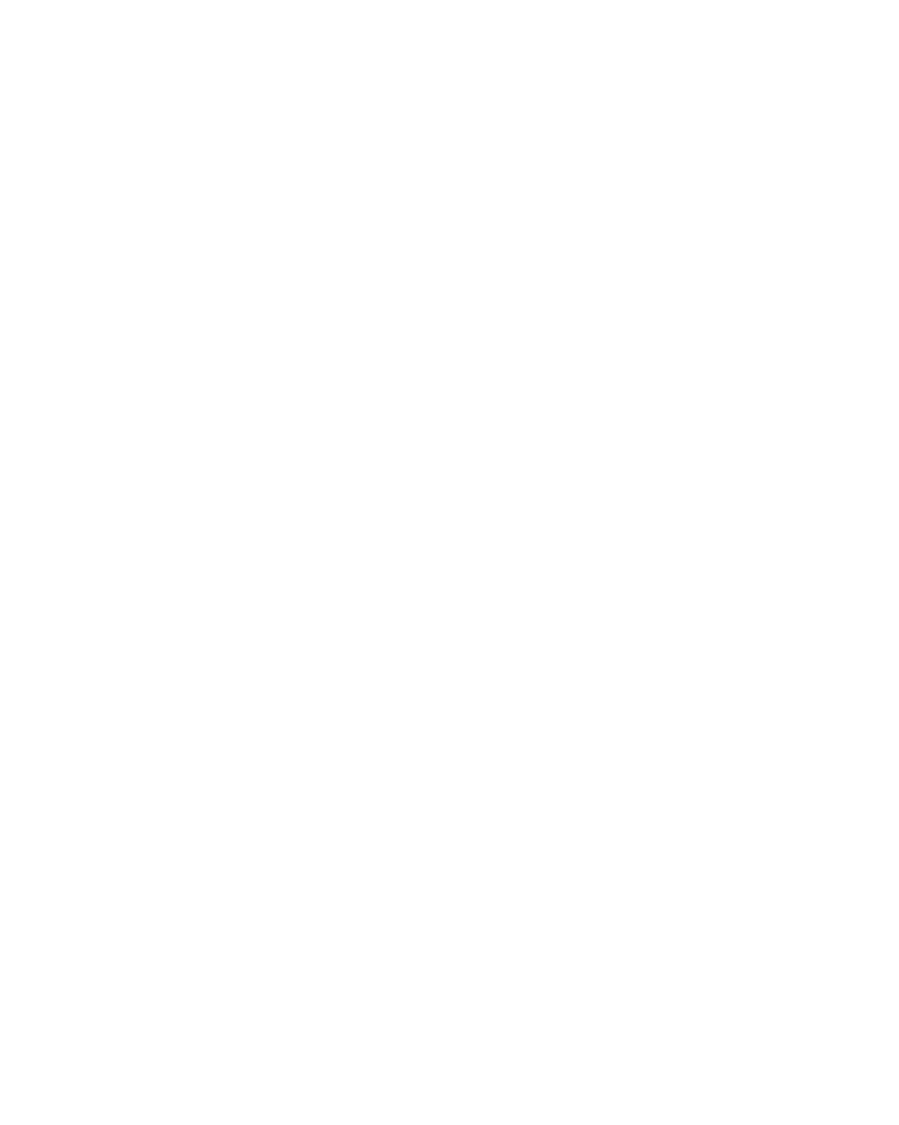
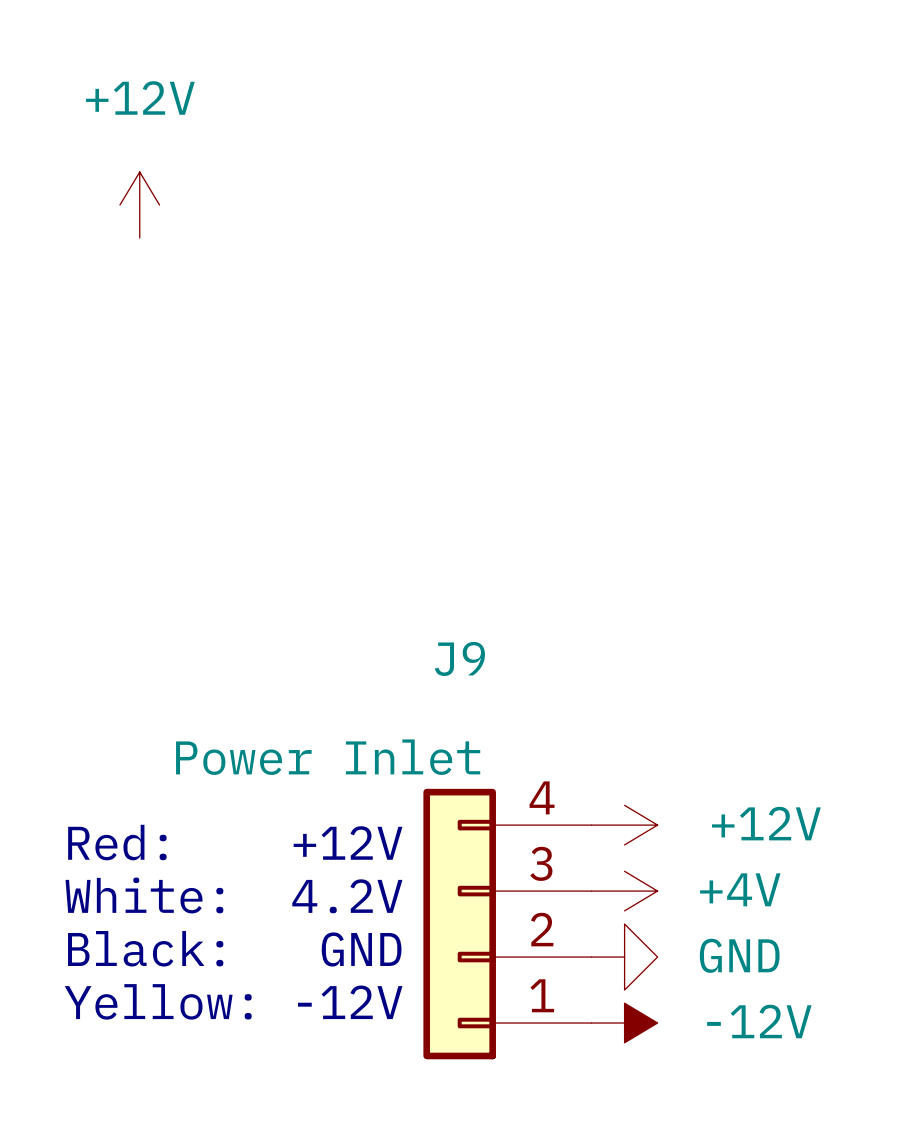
power symbol: none -> +12V (139, 205)
power symbol: none -> +12V (624, 825)
text: none -> Red: +12V (235, 842)
power symbol: none -> +4V (624, 891)
text: none -> White: 4.2V (233, 895)
J9: none -> Power Inlet (507, 924)
text: none -> Black: GND (234, 948)
power symbol: none -> GND (624, 957)
text: none -> Yellow: -12V (233, 1001)
power symbol: none -> -12V (624, 1023)

